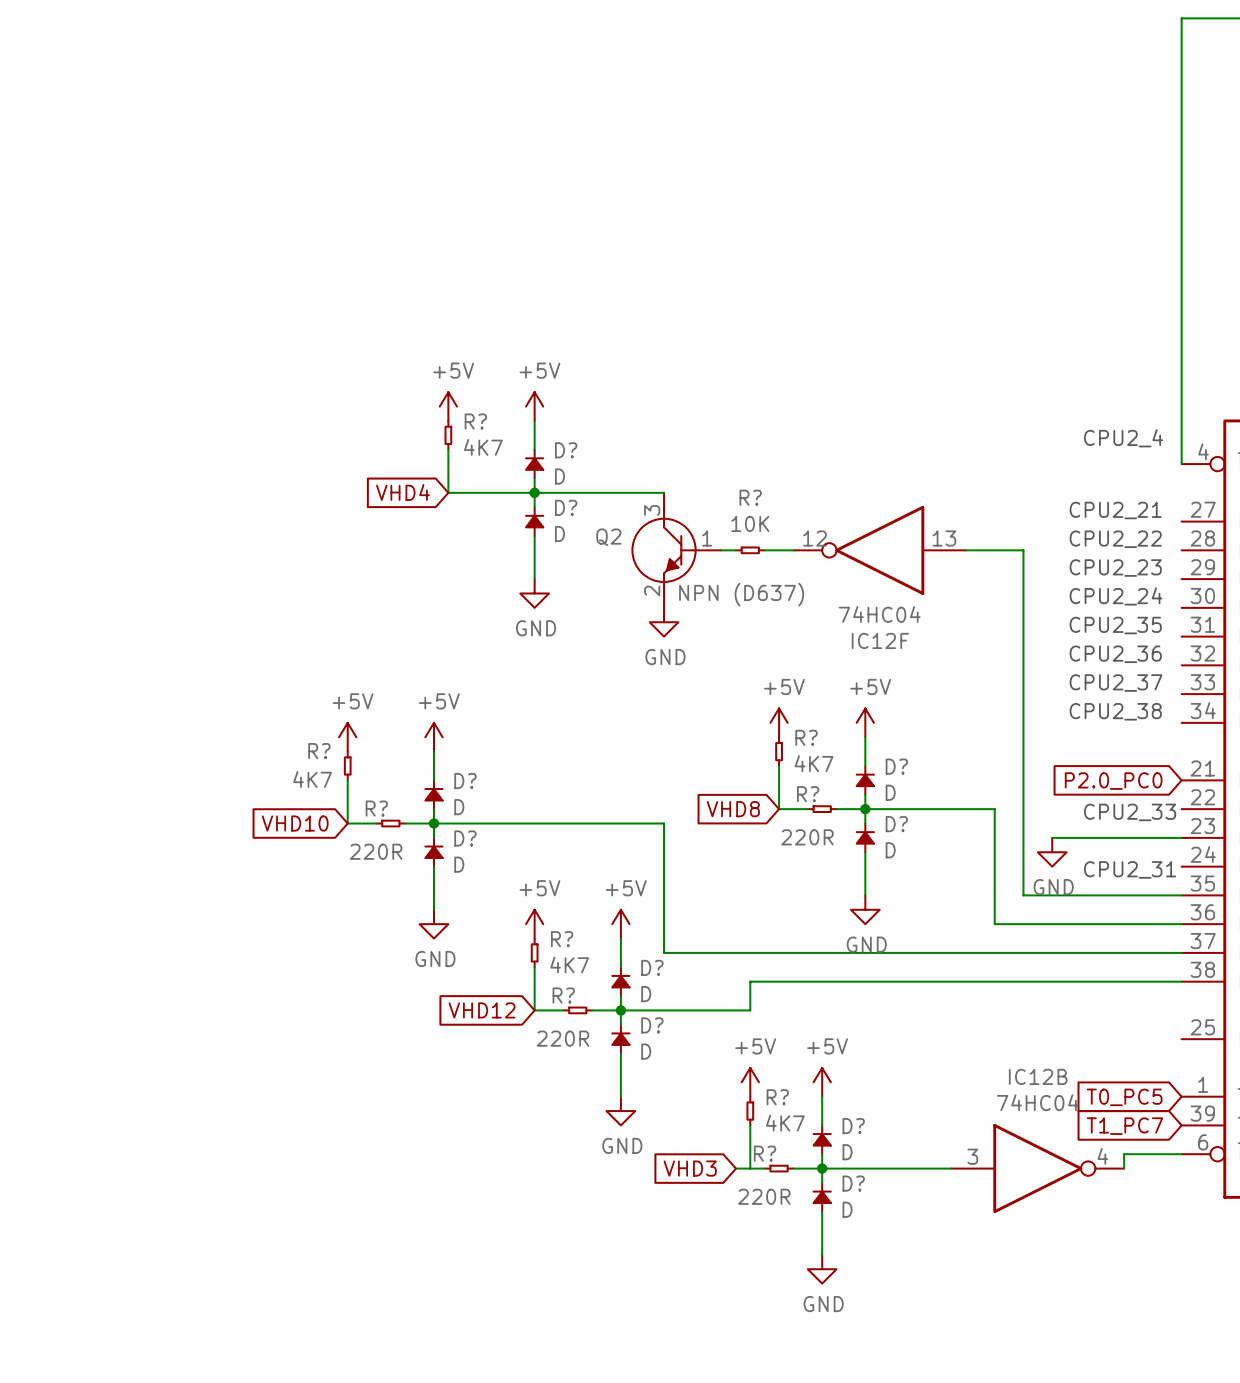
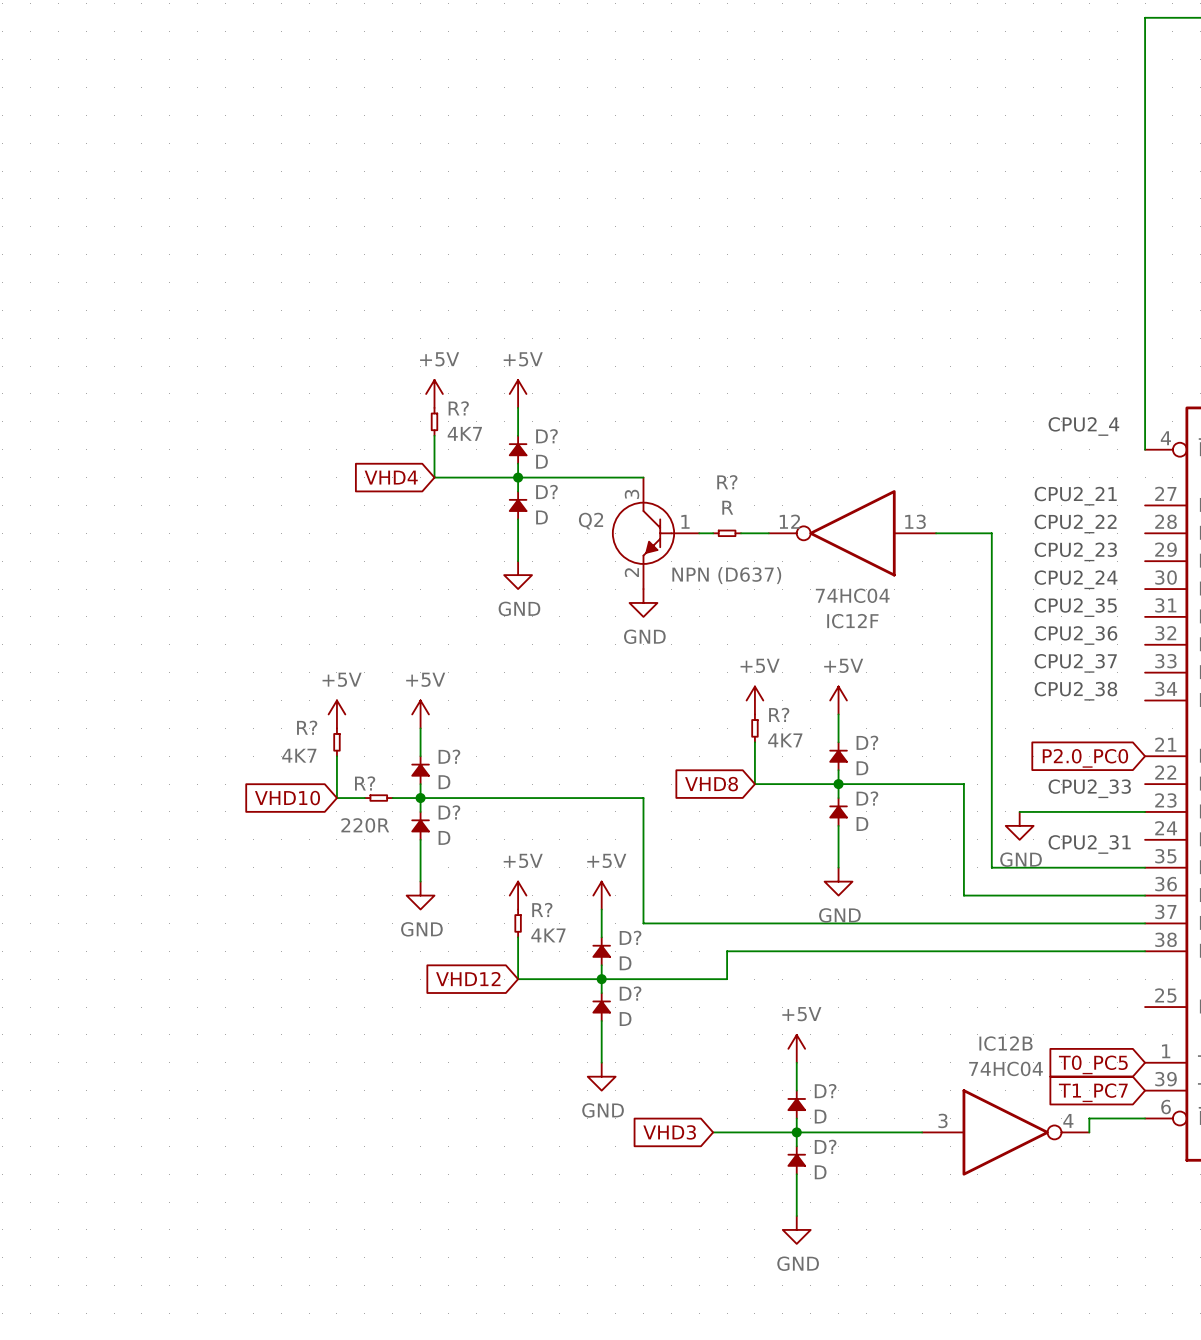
R? value: 10K (750, 523) -> R (727, 507)
R?: 220R (822, 809) -> none
R?: 220R (577, 1010) -> none
power symbol: +5V (750, 1082) -> none
R?: 4K7 (750, 1111) -> none
wire: (750, 1125) (750, 1168) -> none
R?: 220R (779, 1168) -> none

